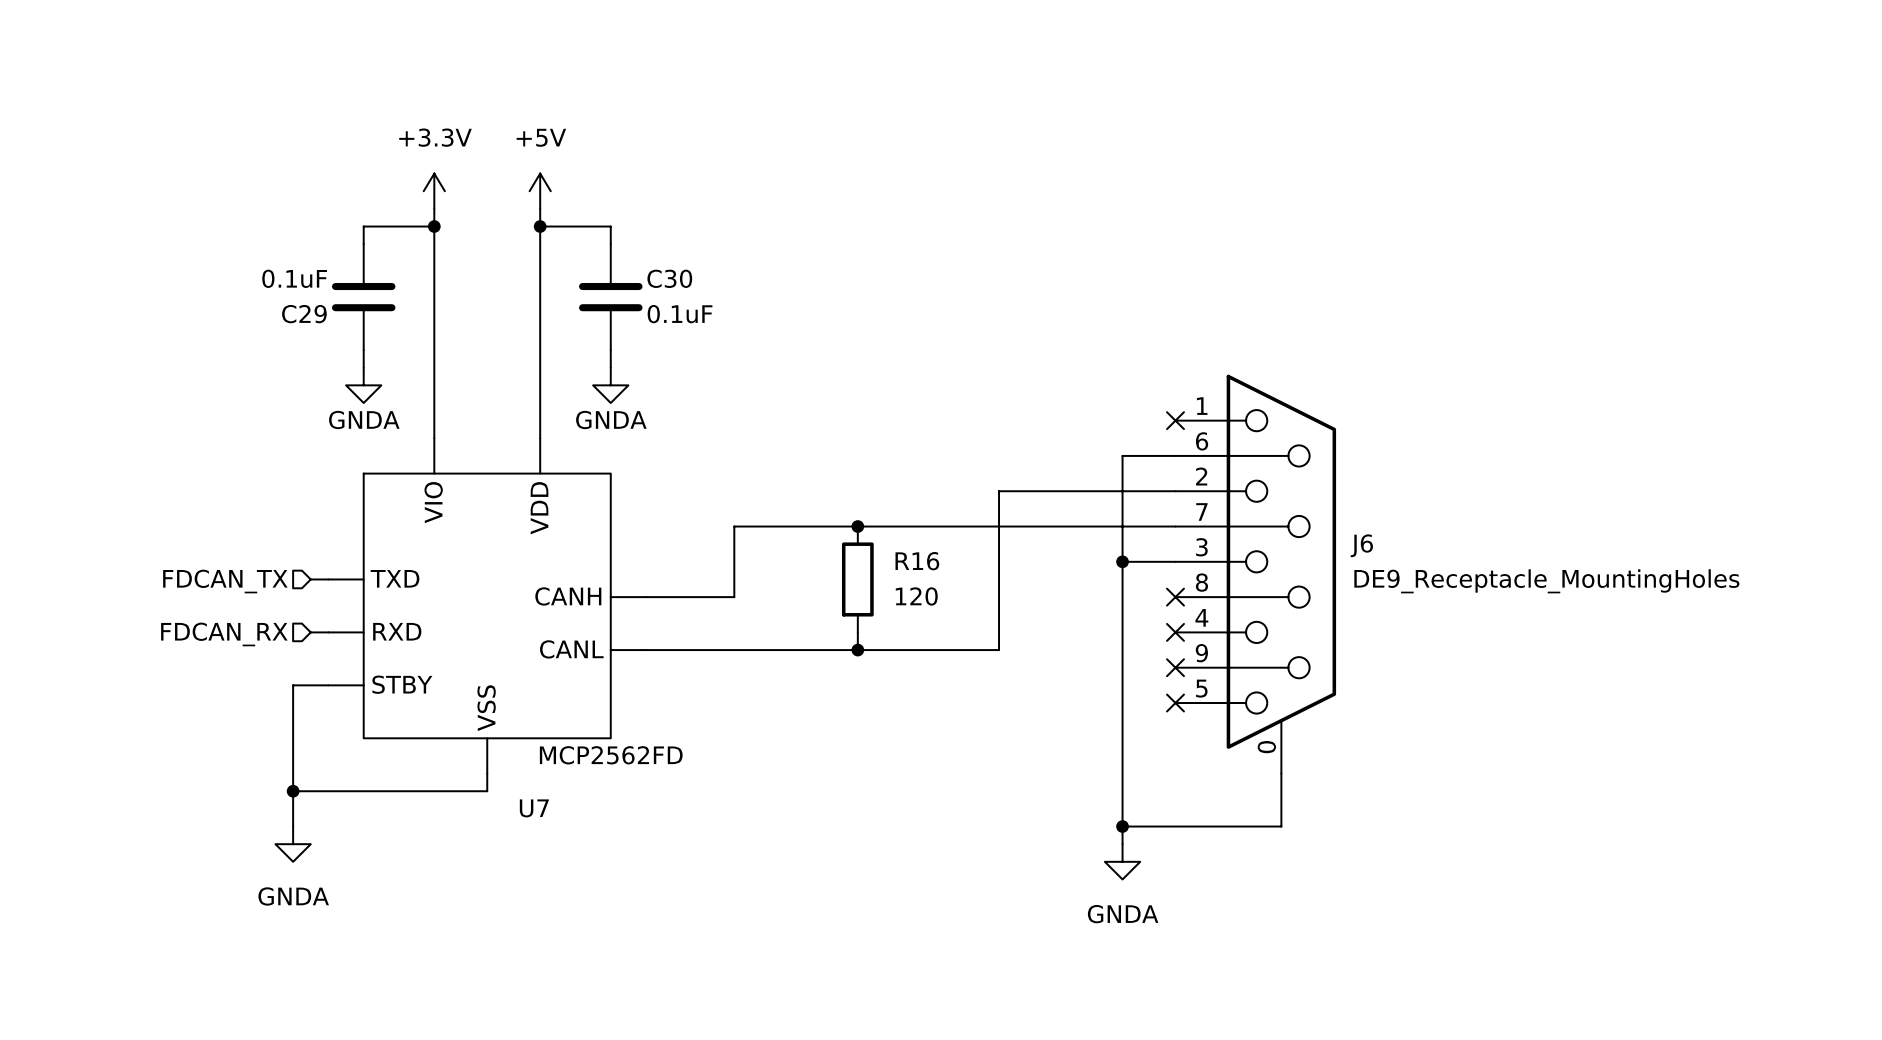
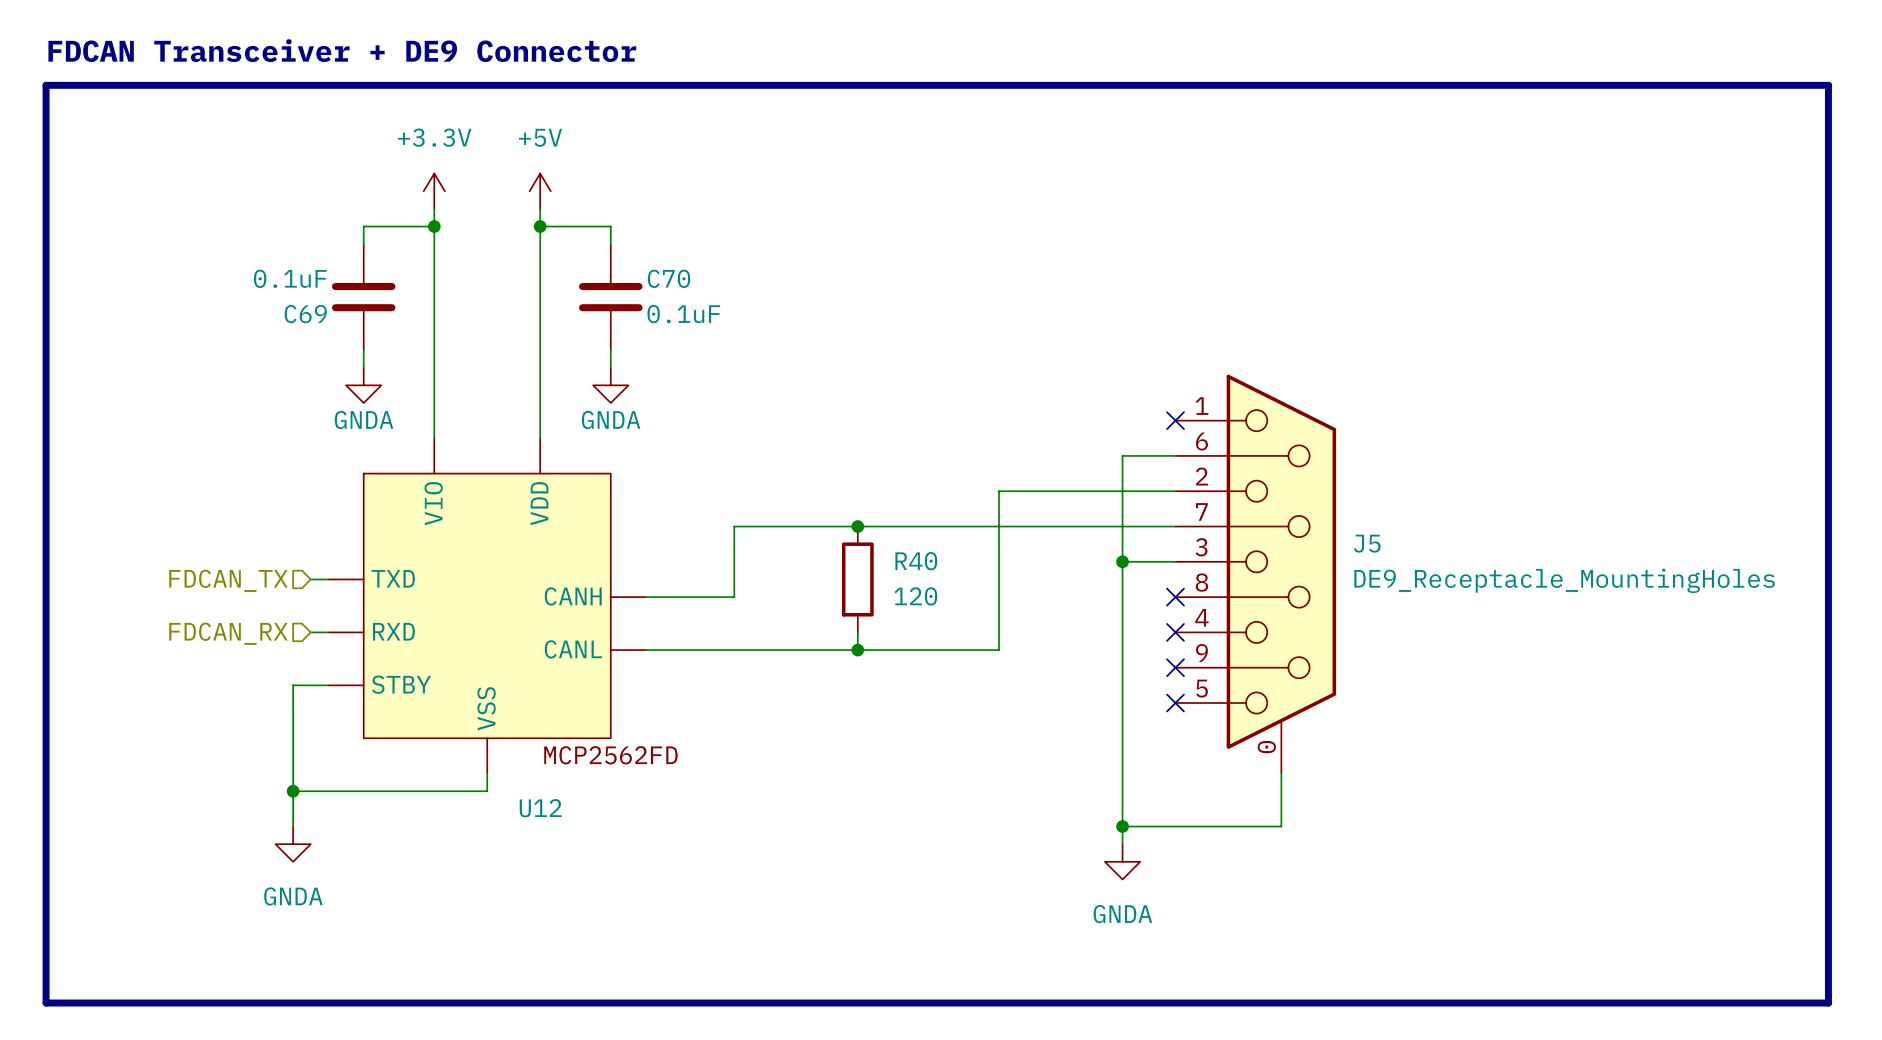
text: none -> FDCAN Transceiver + DE9 Connector (342, 50)
line: none -> (46, 85) (1828, 85) (1828, 1003) (46, 1003) (46, 85)
C30 name: C30 (669, 278) -> C70 (669, 278)
C29 name: C29 (304, 314) -> C69 (305, 314)
J6 name: J6 (1361, 545) -> J5 (1367, 543)
R16 name: R16 (917, 561) -> R40 (916, 561)
U7 name: U7 (534, 808) -> U12 (540, 808)

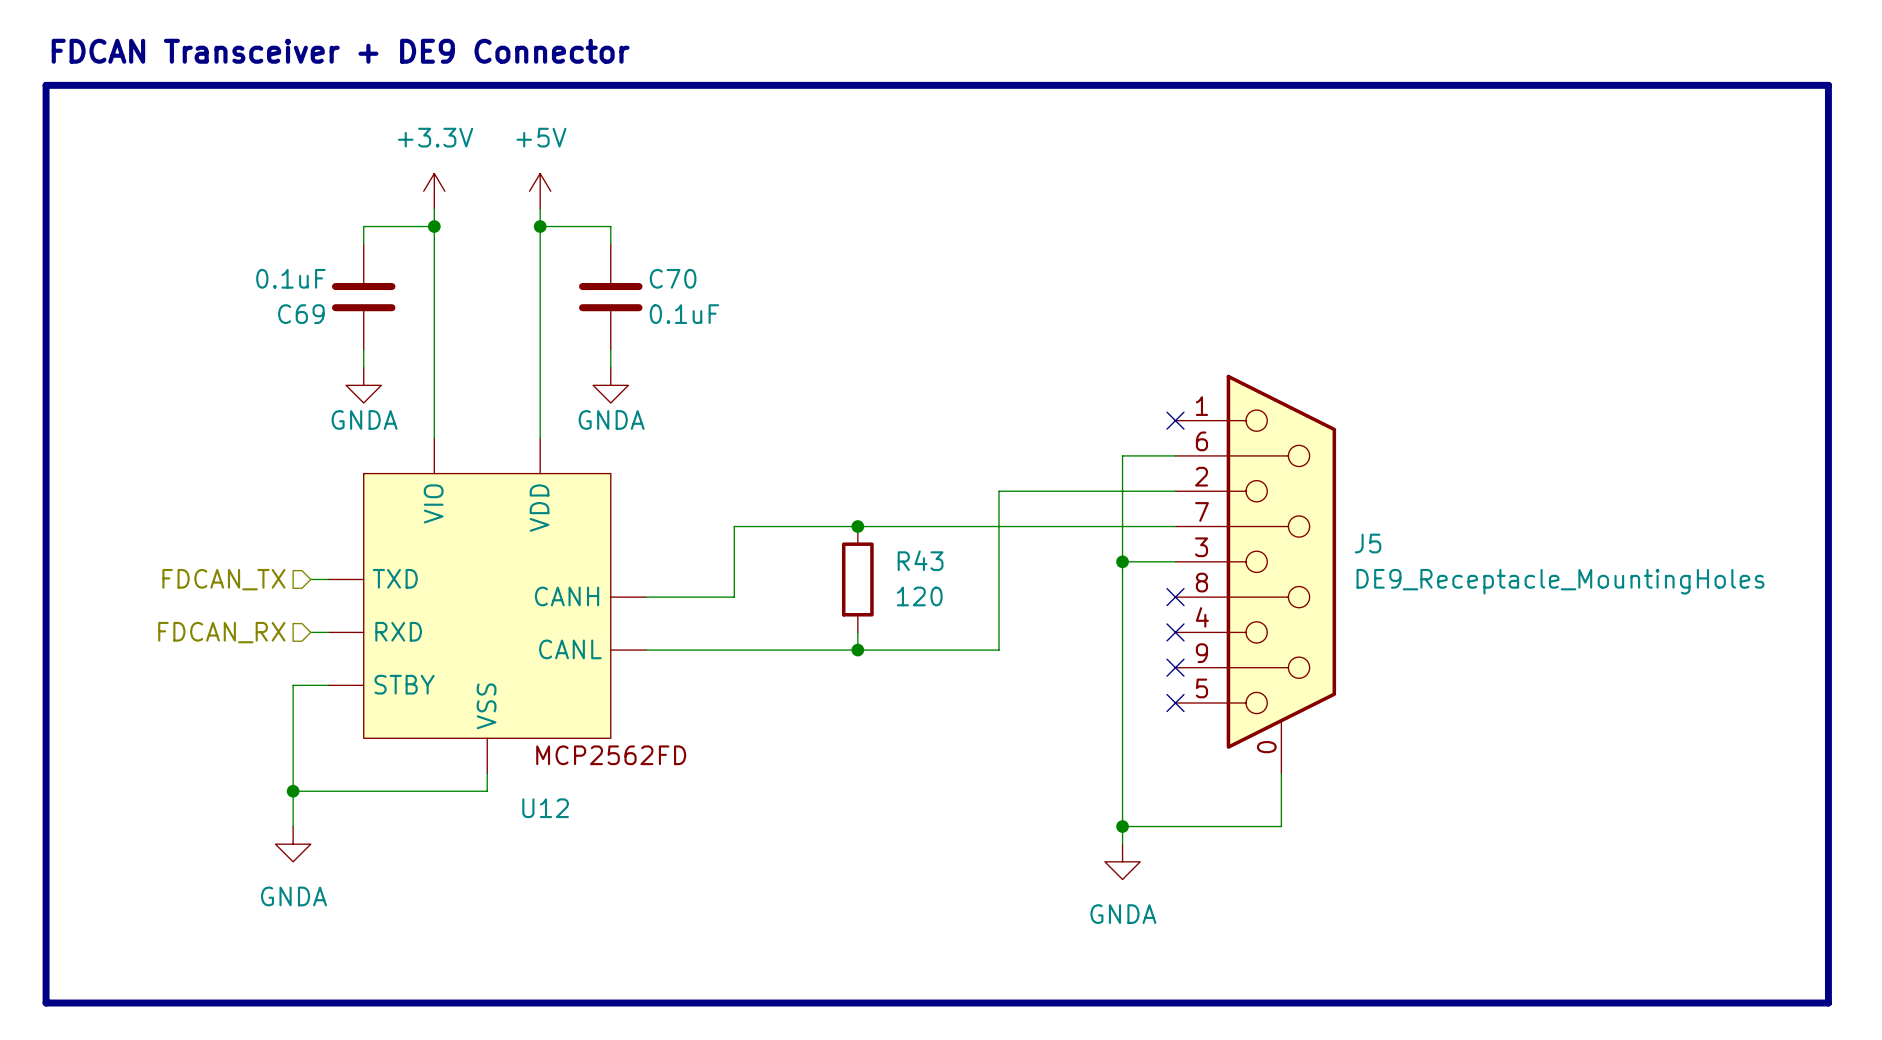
R40 name: R40 (916, 561) -> R43 (920, 560)

